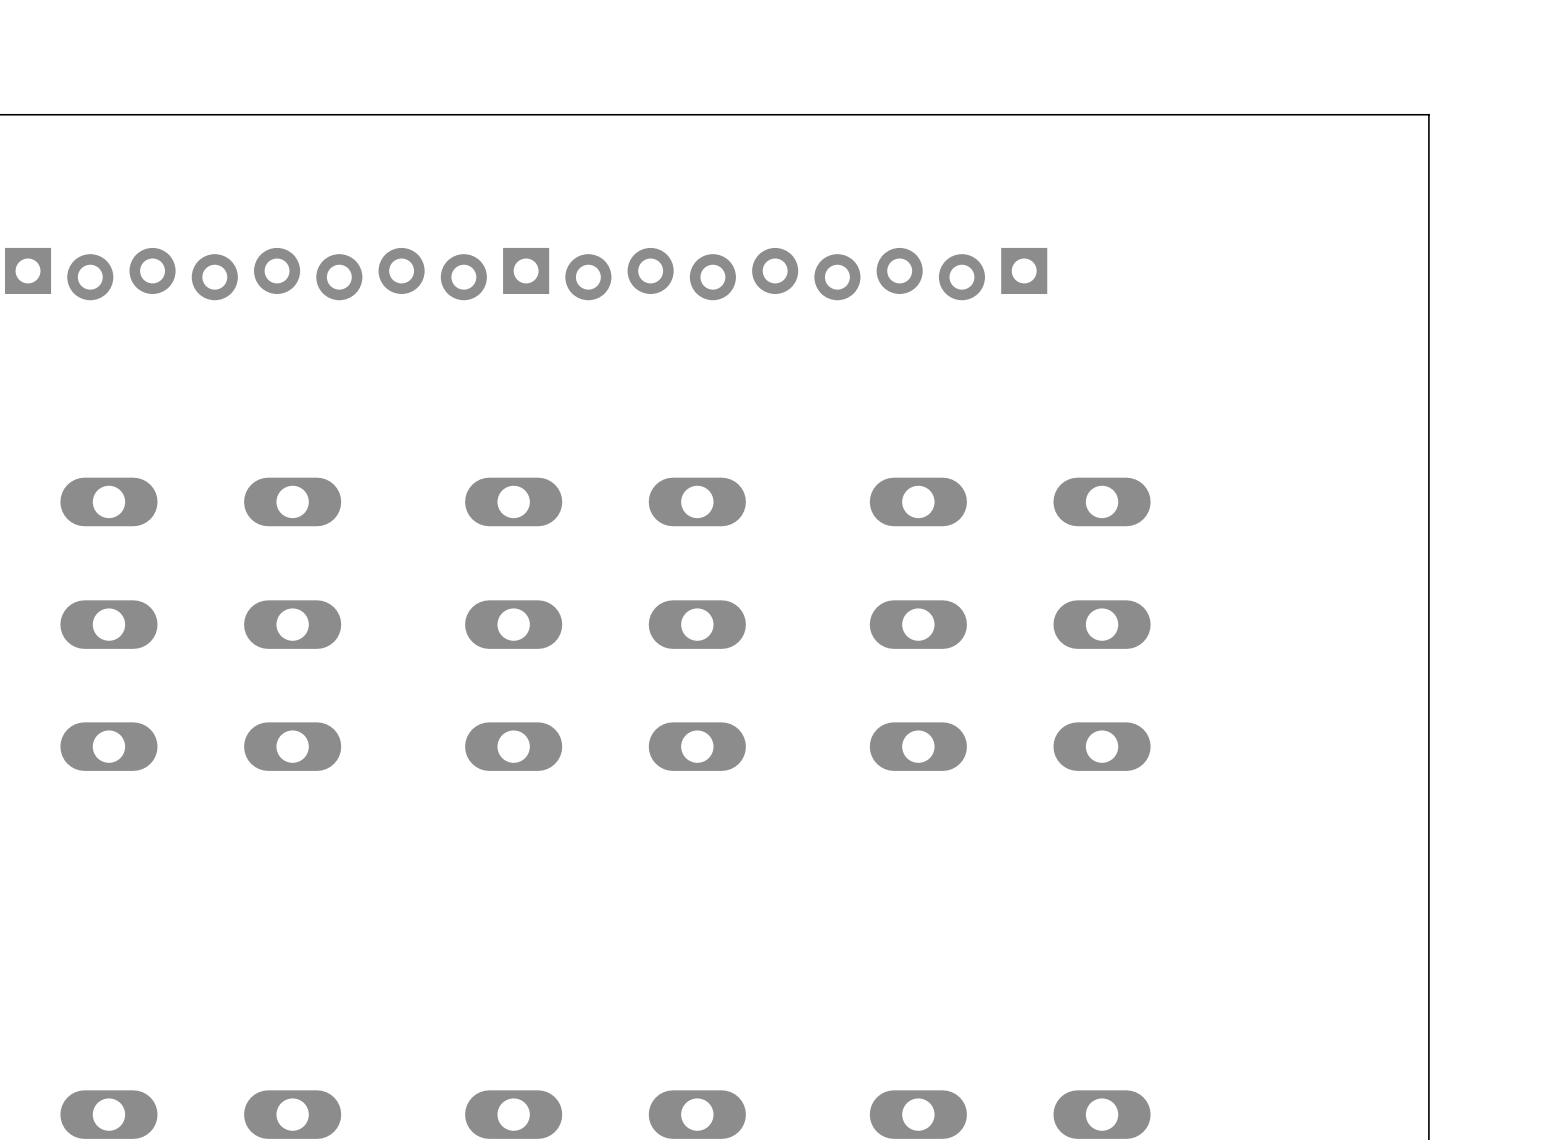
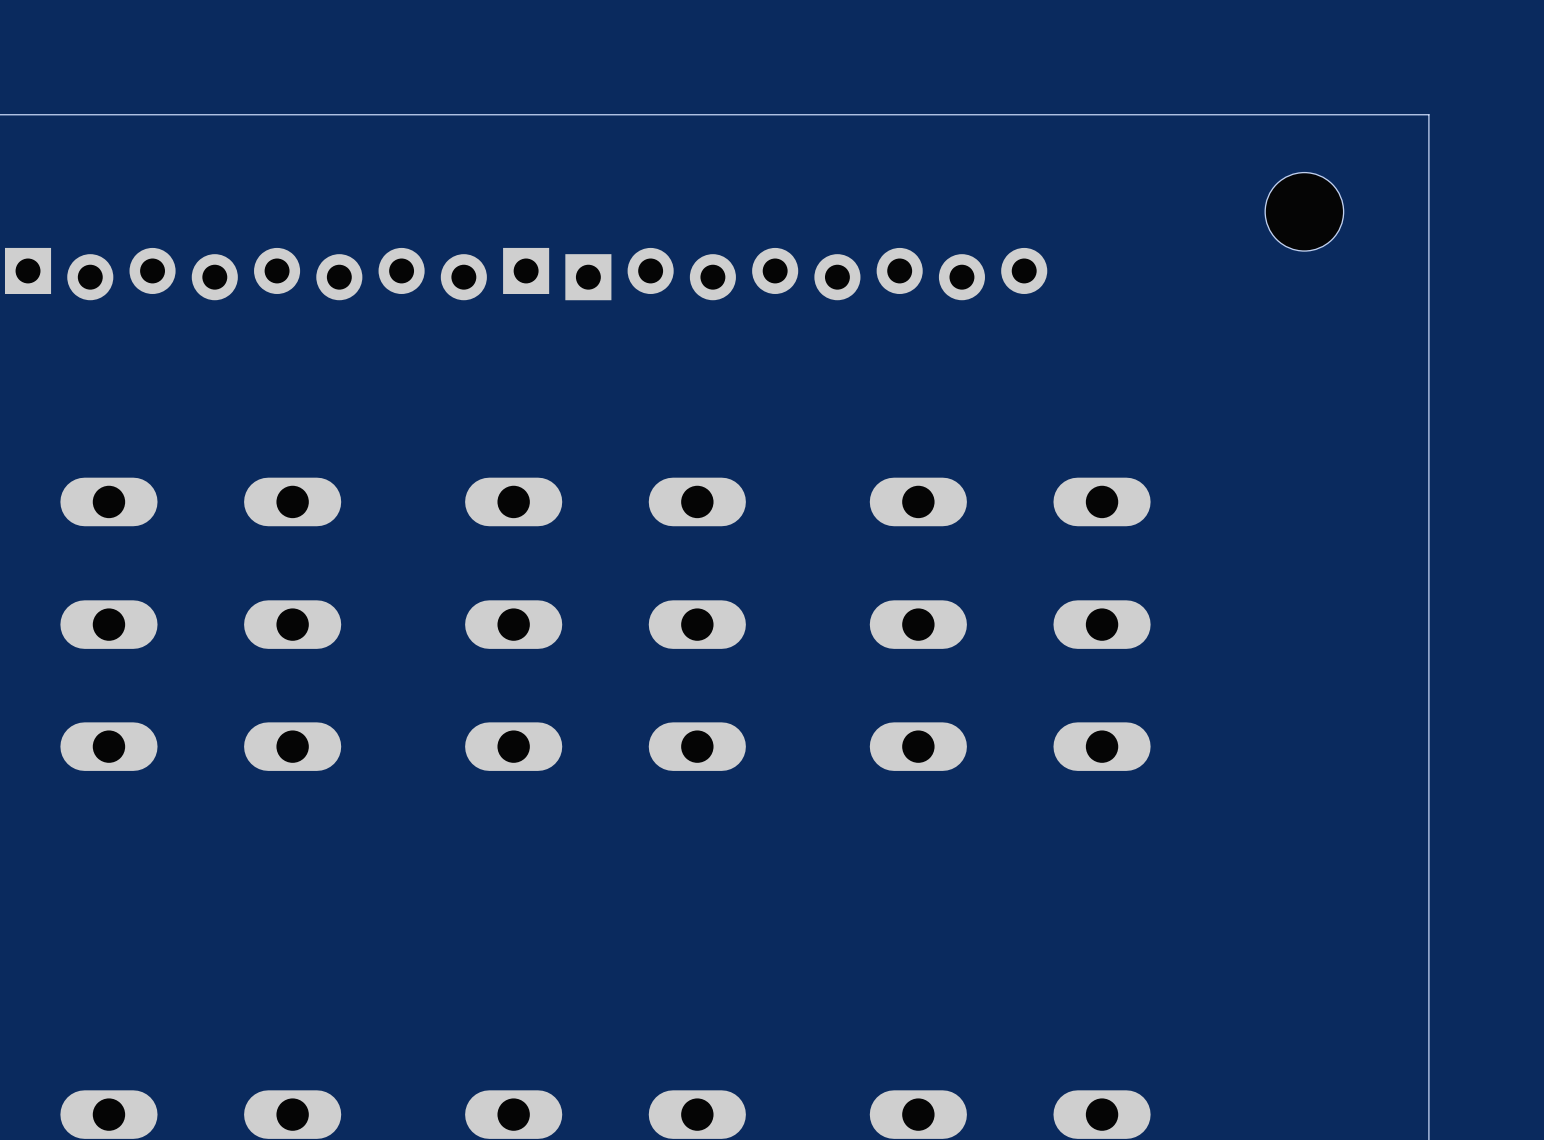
hole: none -> (1304, 211)
part rotation: 0° (806, 274) -> 180° (806, 274)

